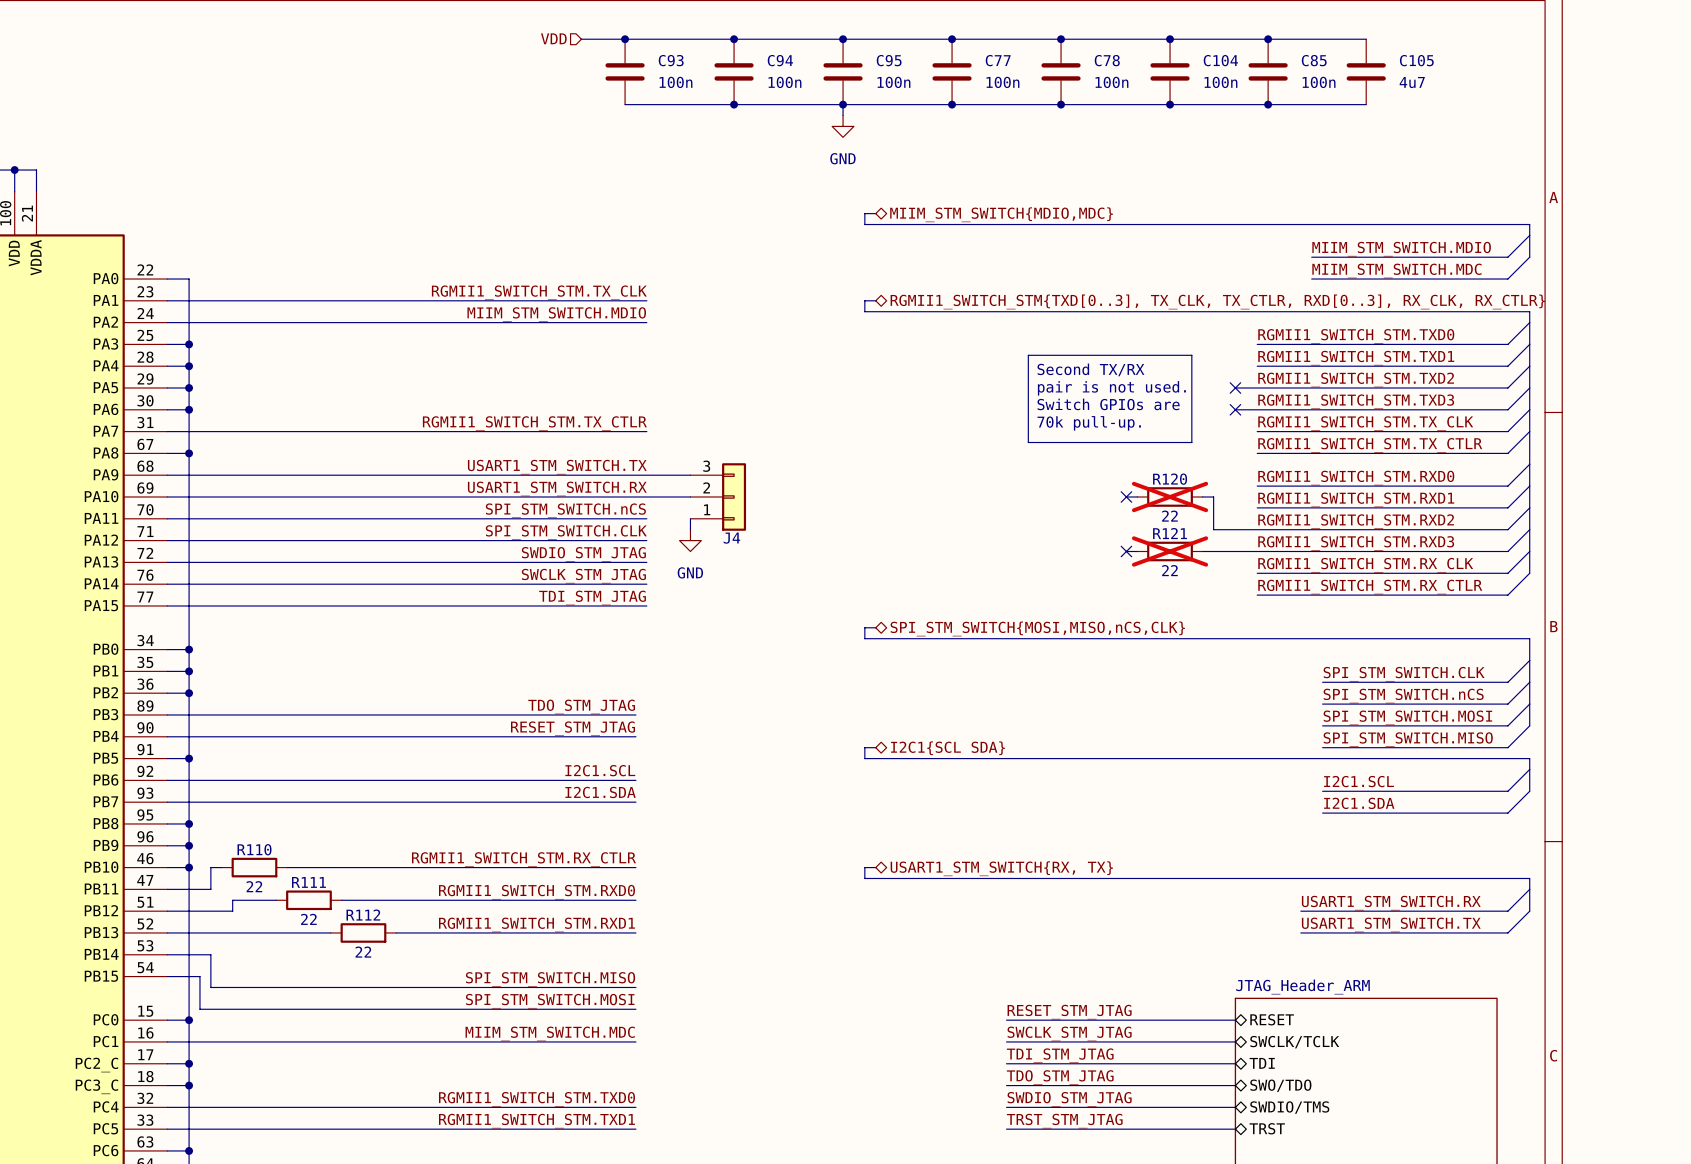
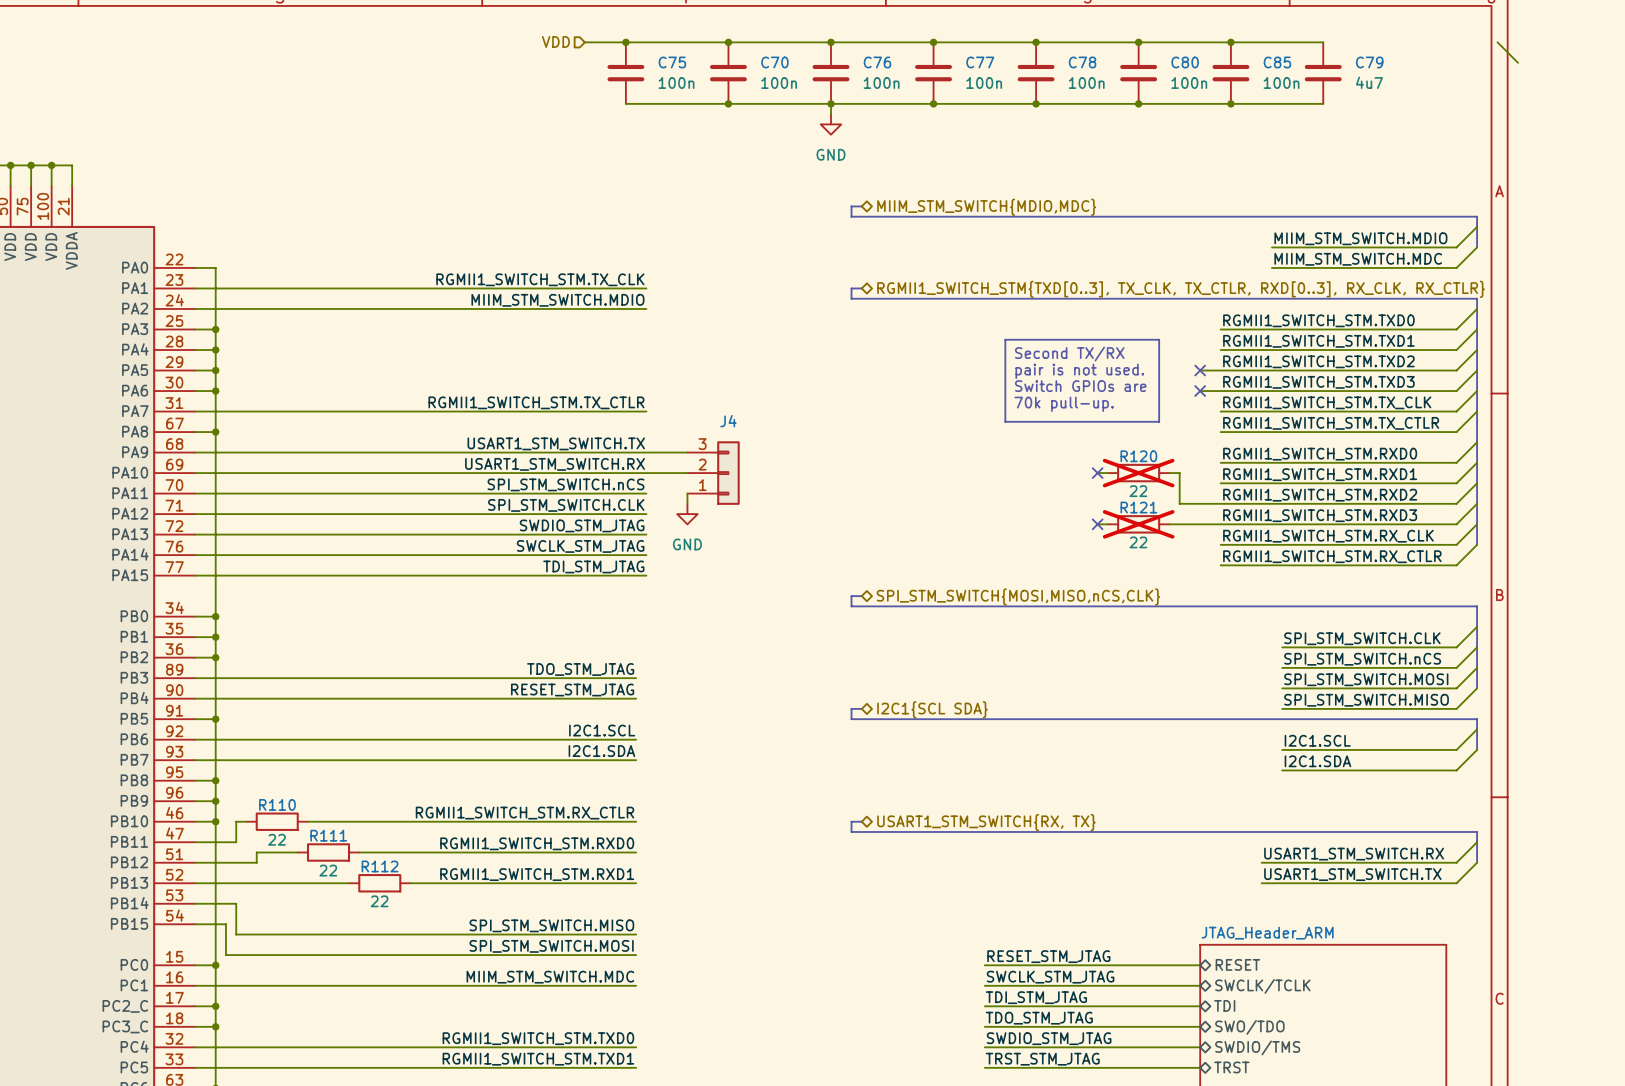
wire: none -> (1497, 42) (1518, 62)
C93 name: C93 (671, 60) -> C75 (672, 62)
C94 name: C94 (780, 60) -> C70 (774, 62)
C95 name: C95 (889, 60) -> C76 (877, 62)
C104 name: C104 (1220, 60) -> C80 (1185, 62)
C105 name: C105 (1416, 60) -> C79 (1369, 62)
J4 name position: J4 (731, 538) -> J4 (728, 421)

